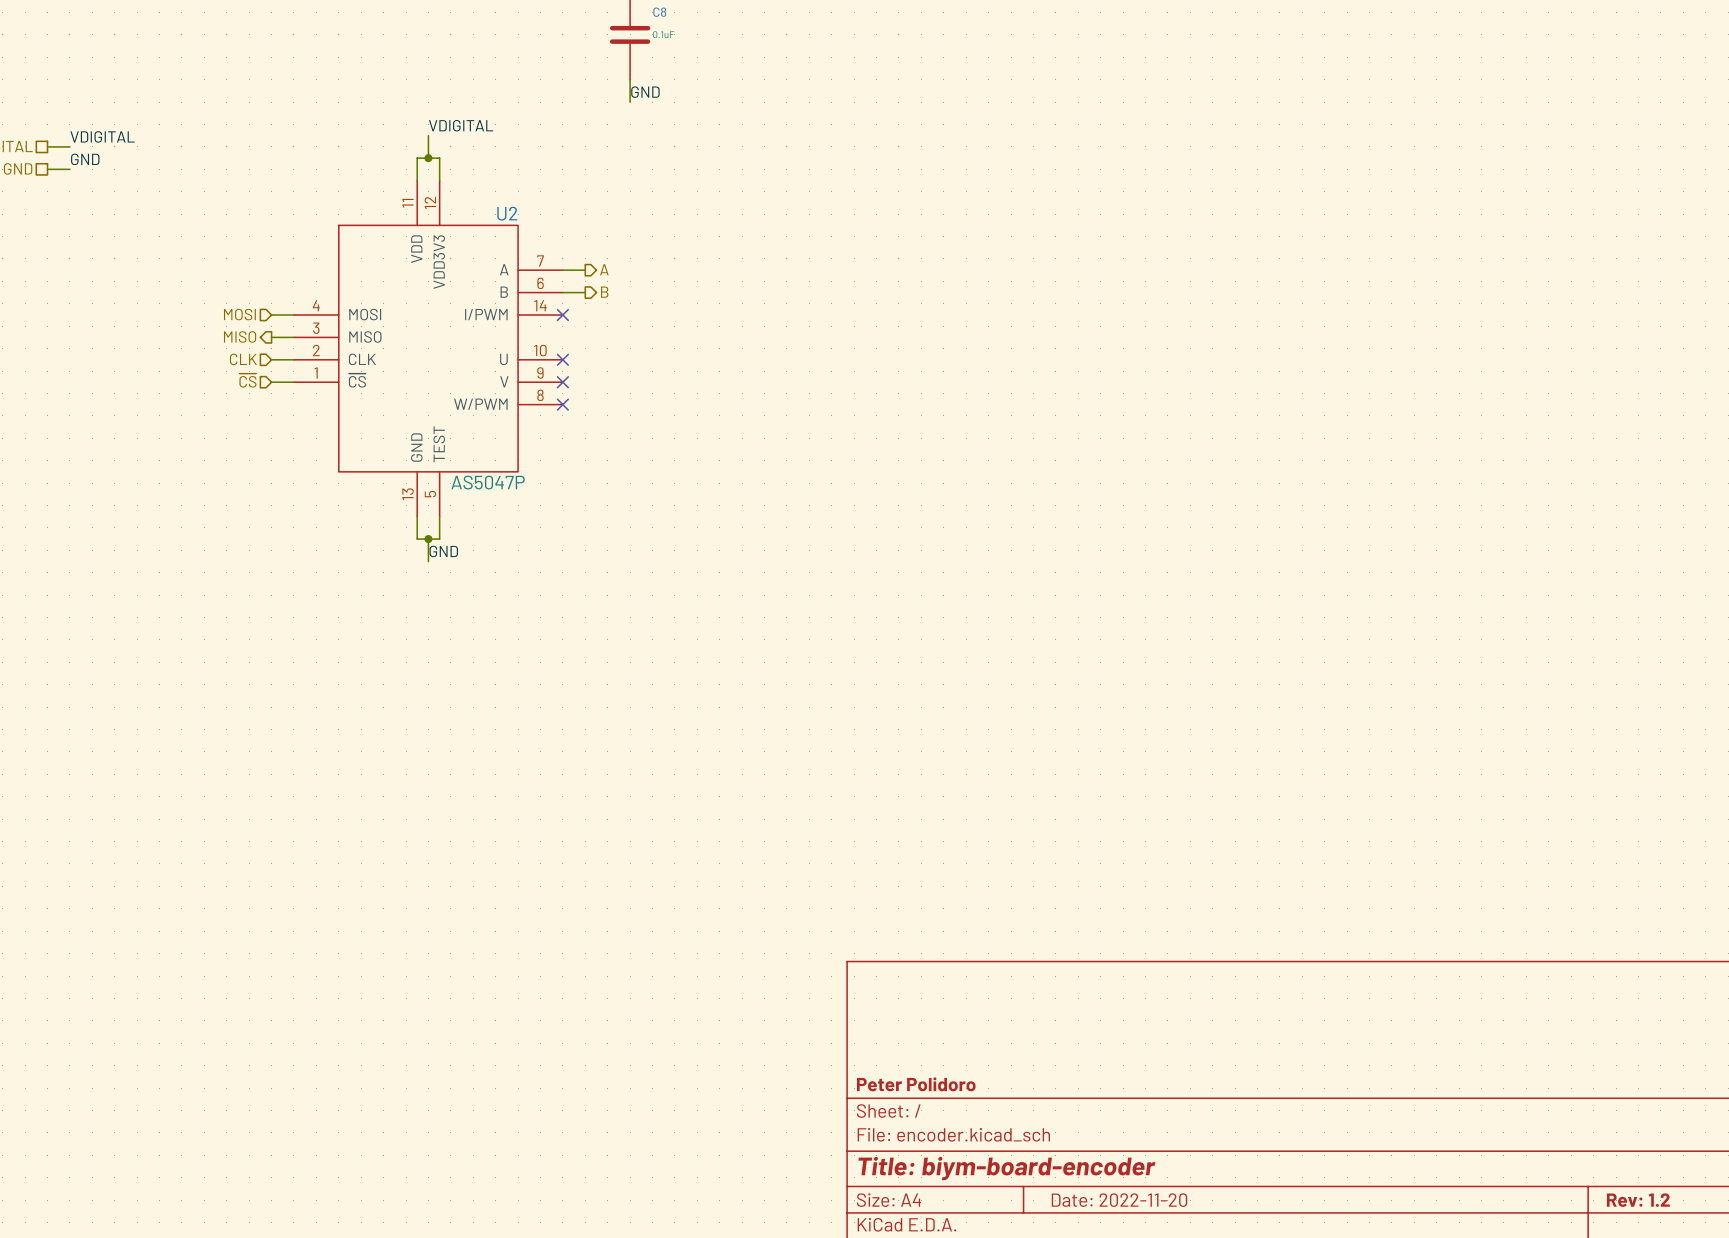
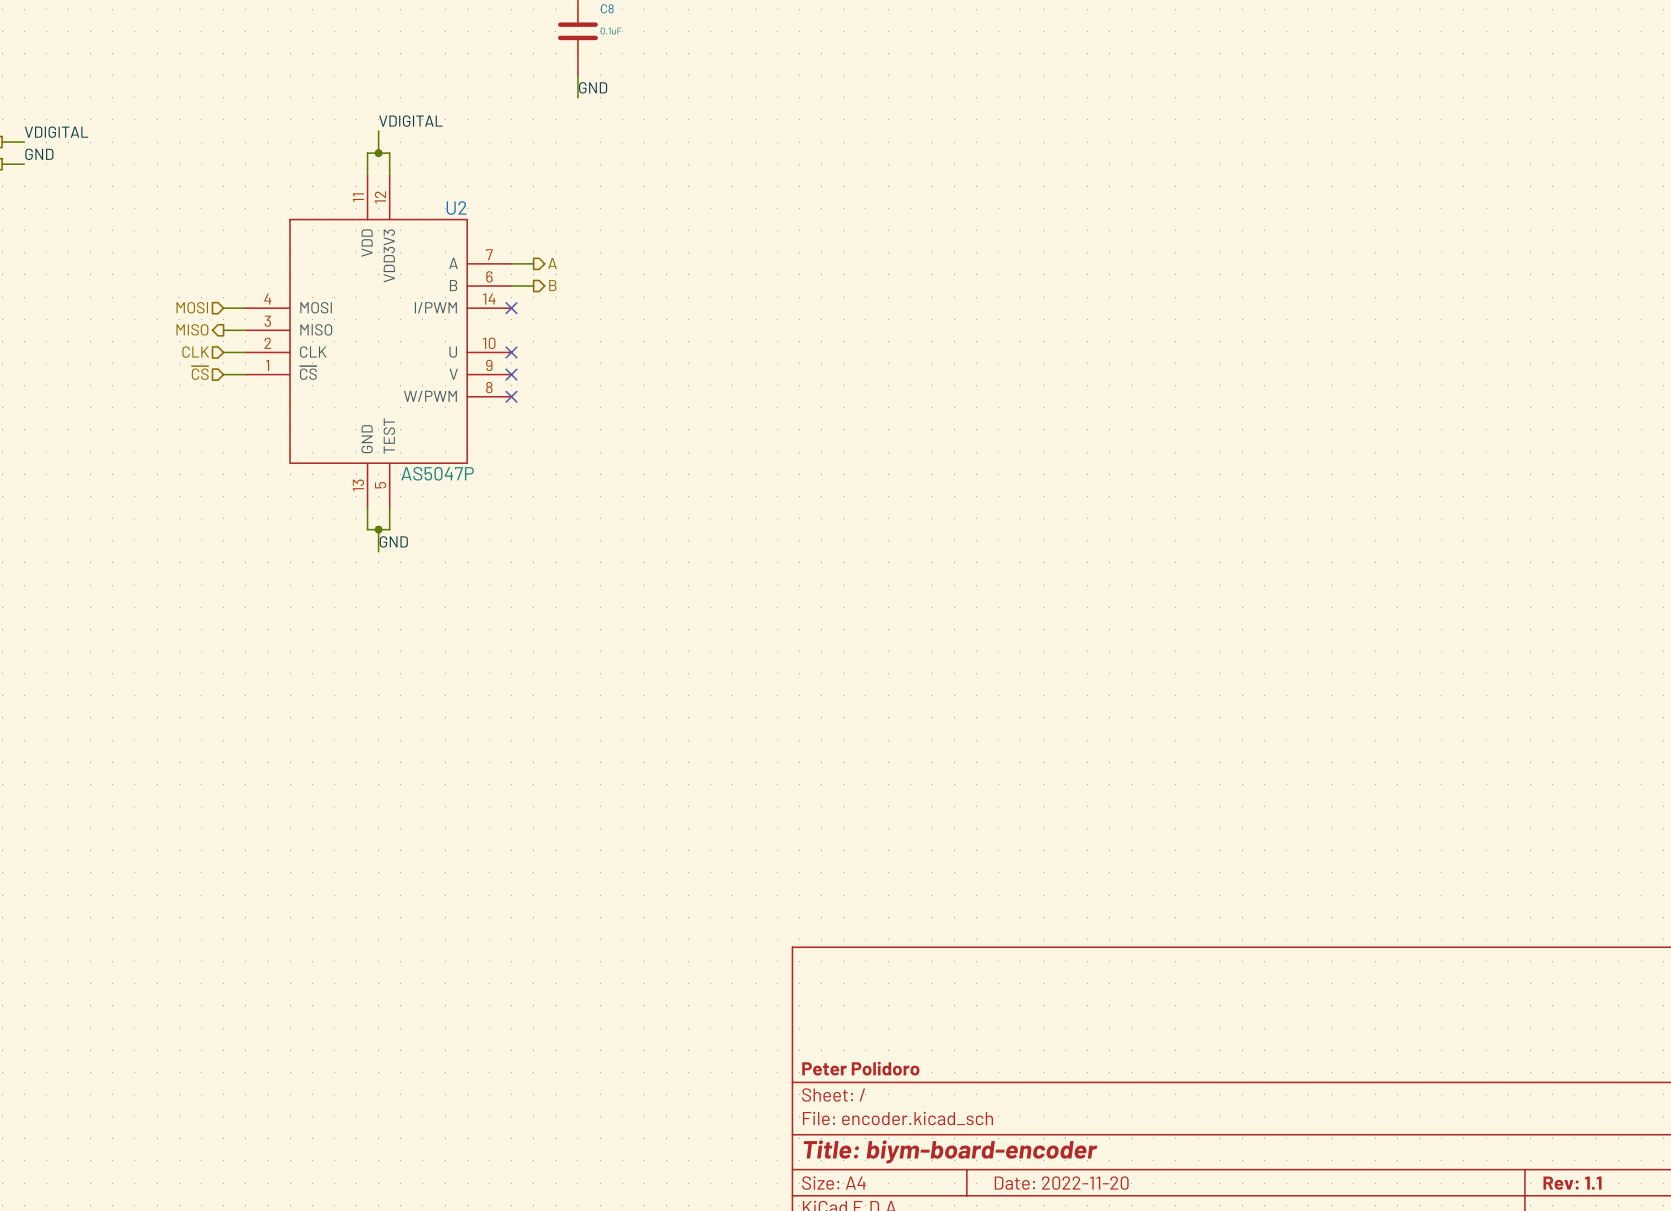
title block: Rev: 1.2 (1638, 1200) -> Rev: 1.1 (1572, 1183)

